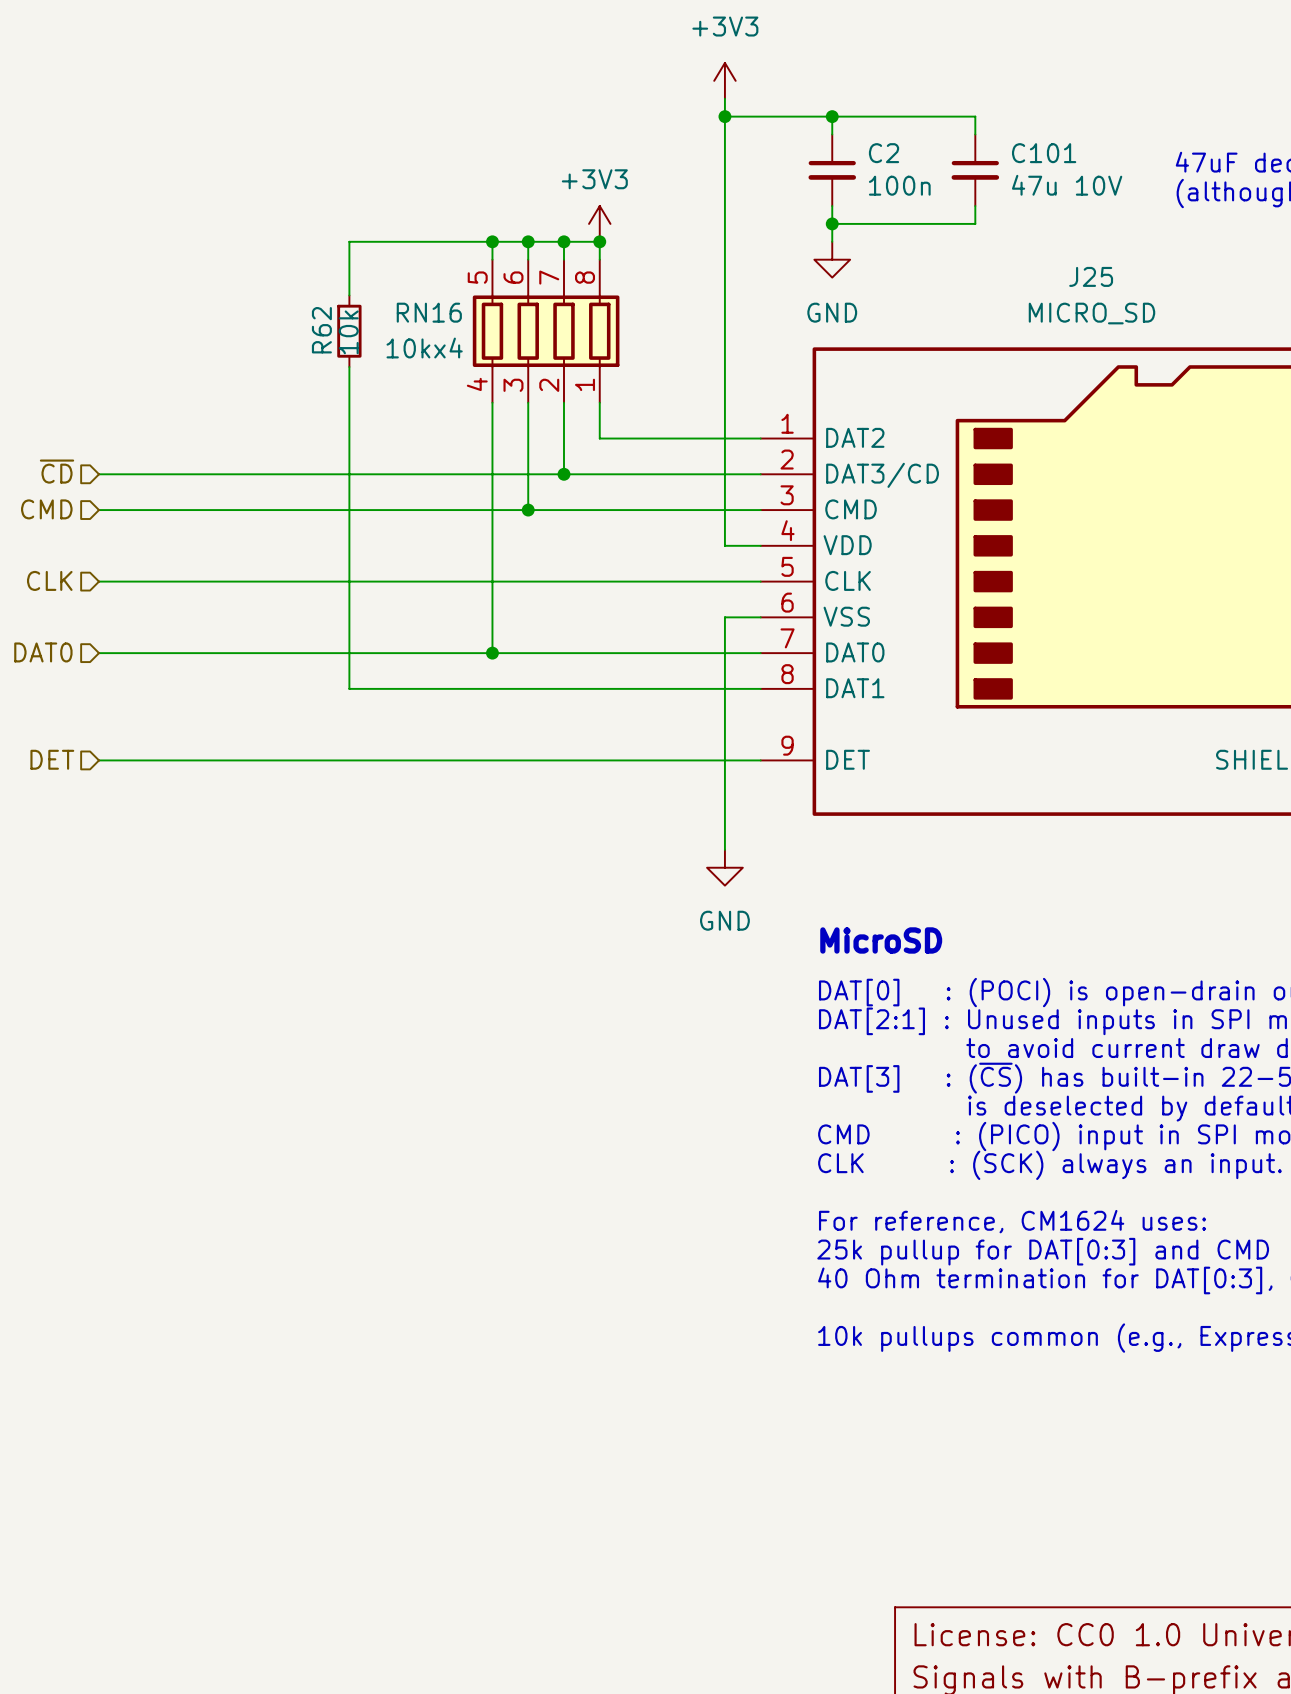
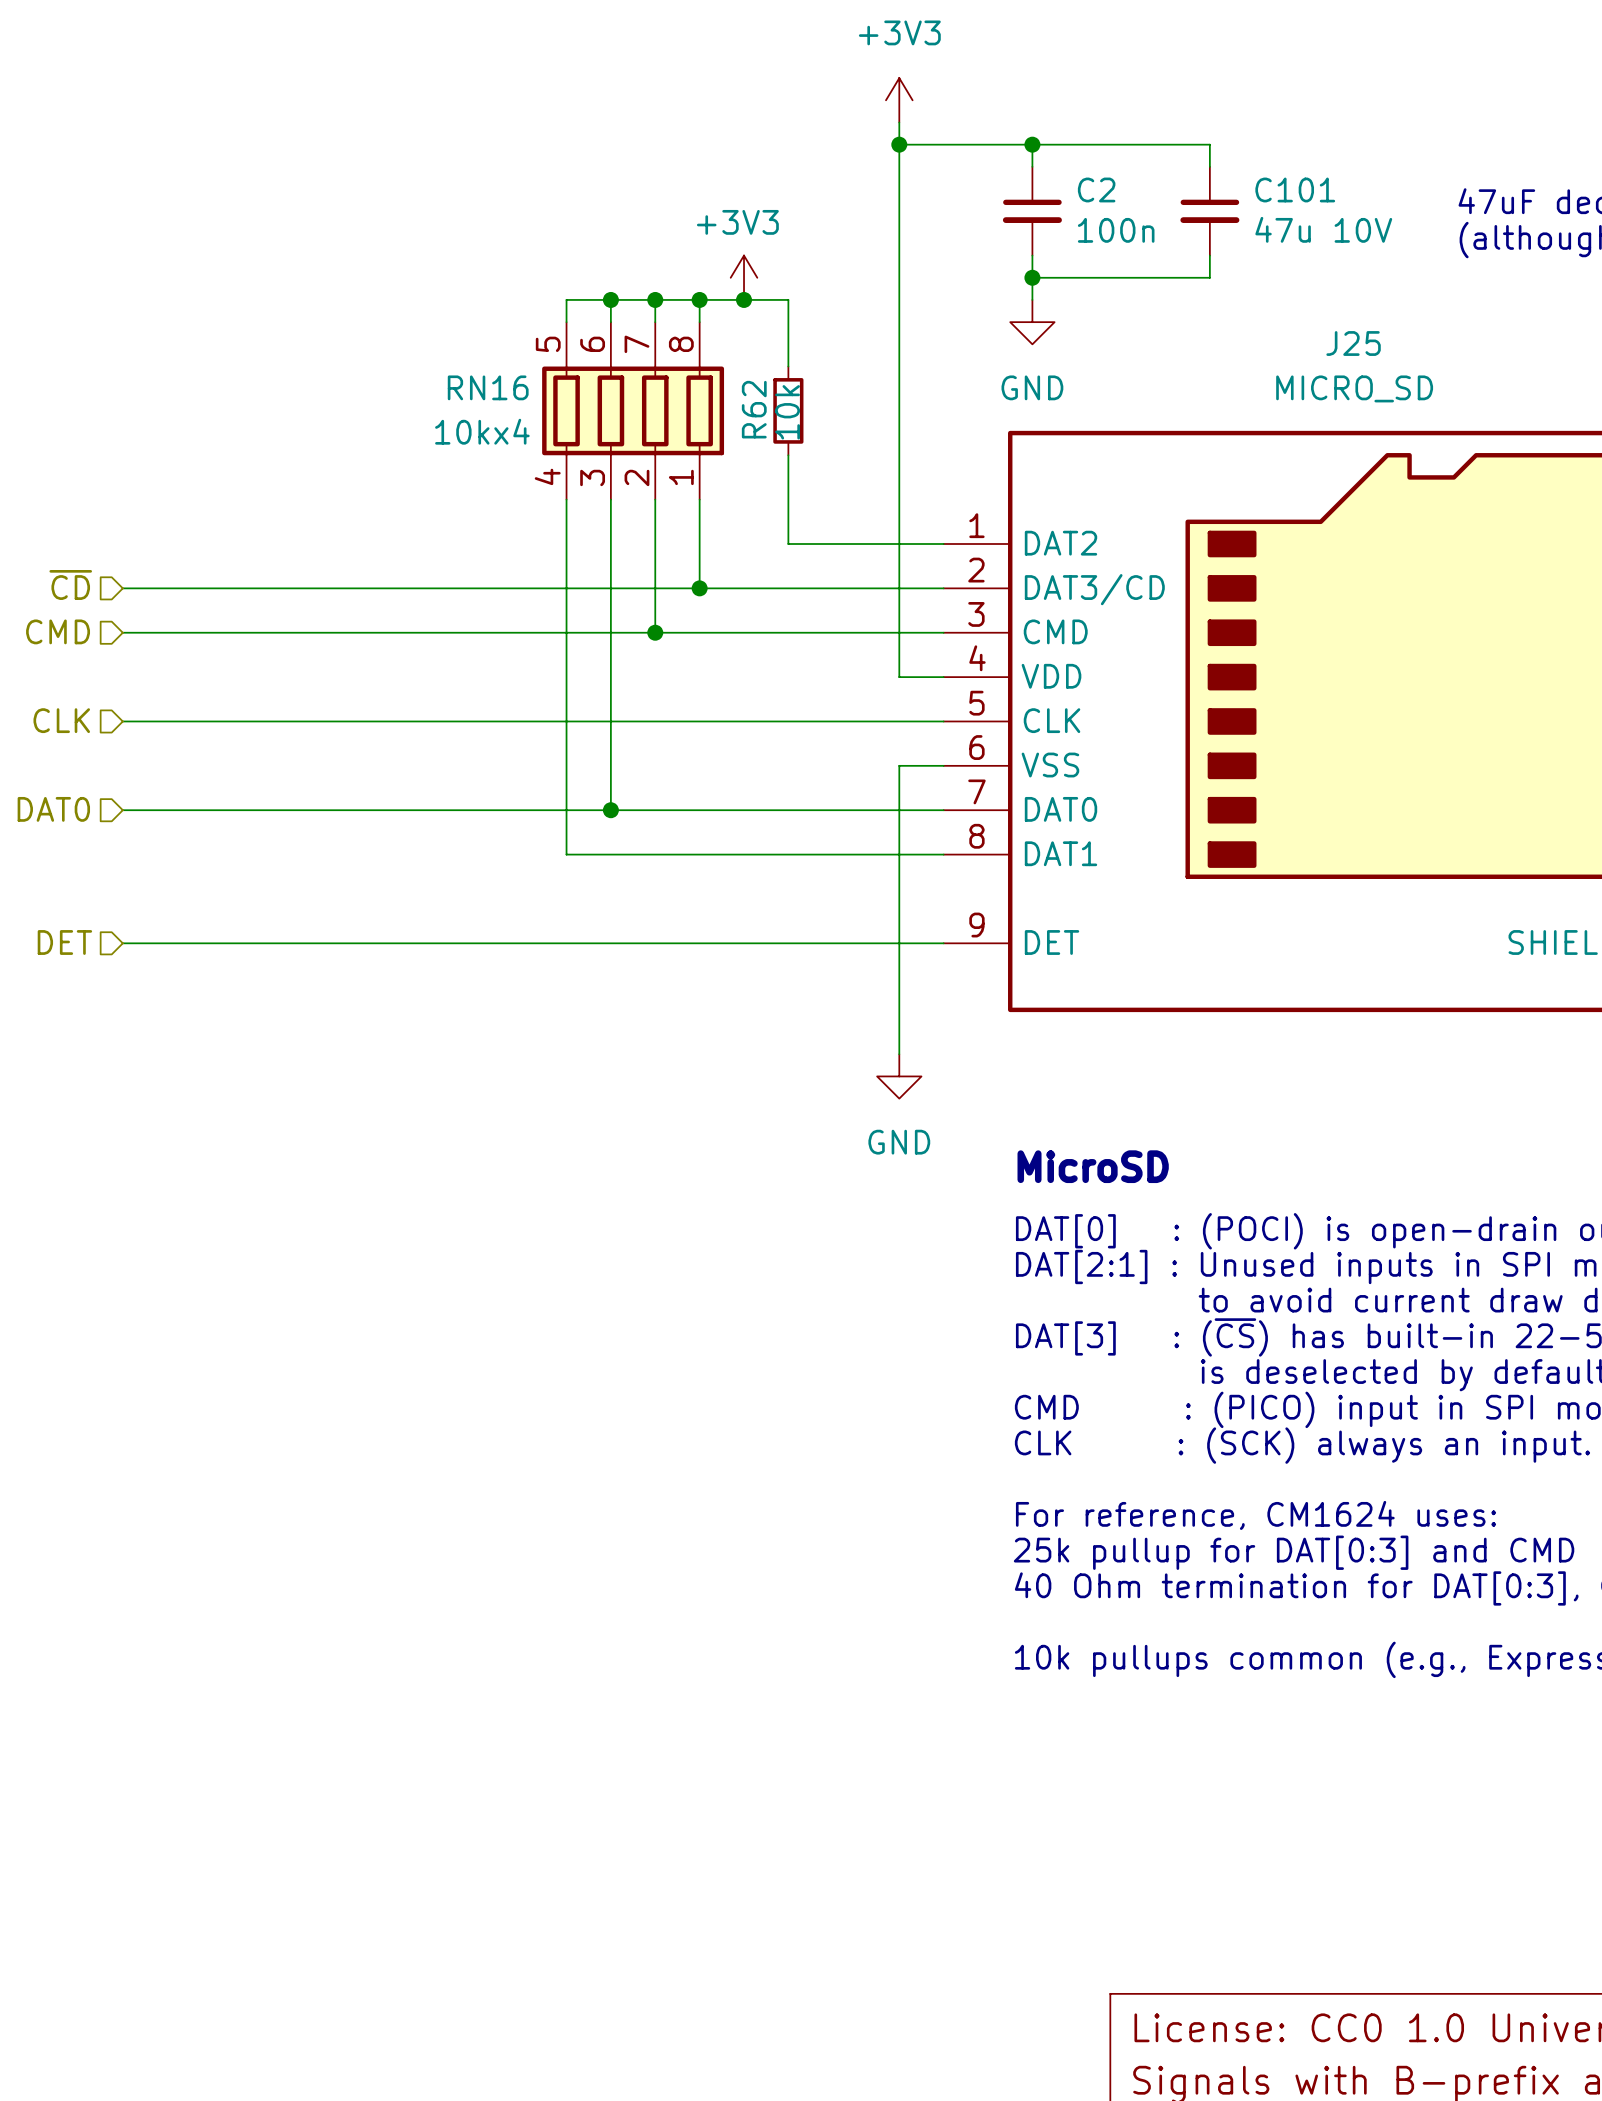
wire: (456, 241) (349, 241) (349, 295) -> (566, 299) (566, 322)
wire: (599, 241) (599, 259) -> (744, 299) (788, 299) (788, 366)
R62 position: (349, 331) -> (788, 410)
RN16 position: (546, 331) -> (633, 410)
wire: (349, 366) (349, 688) (456, 688) -> (566, 499) (566, 854)
wire: (599, 402) (599, 438) (635, 438) -> (788, 455) (788, 543)

